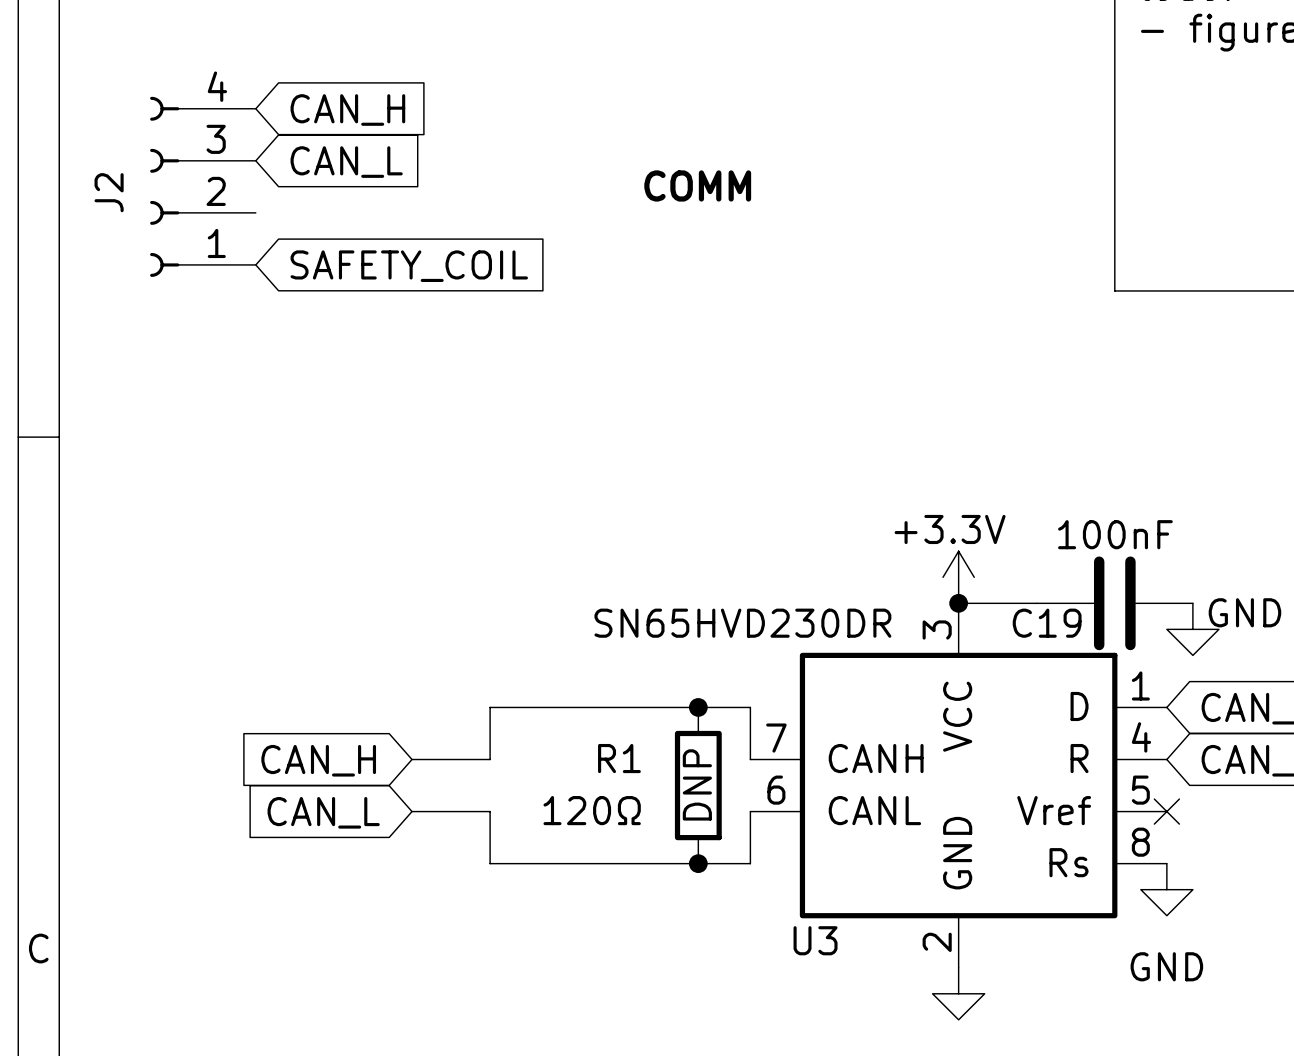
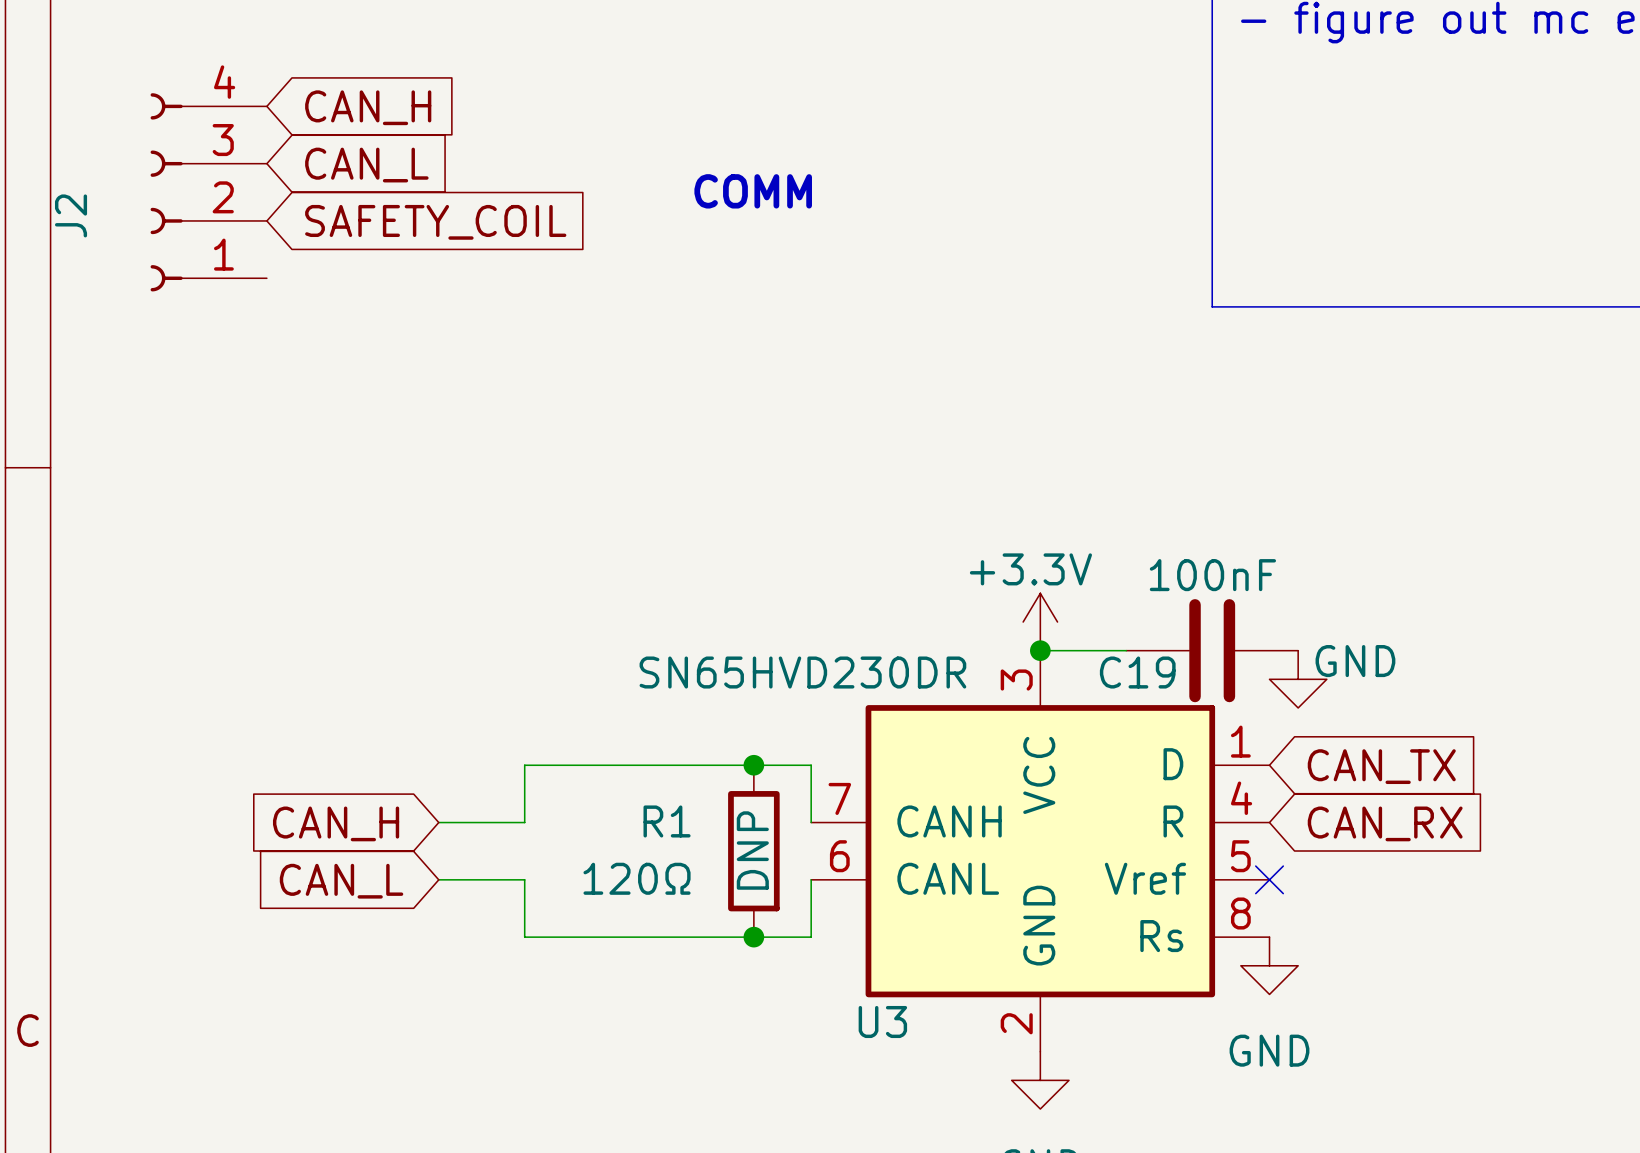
J2 name position: J2 (109, 192) -> J2 (71, 215)
global label position: SAFETY_COIL (409, 266) -> SAFETY_COIL (435, 222)

